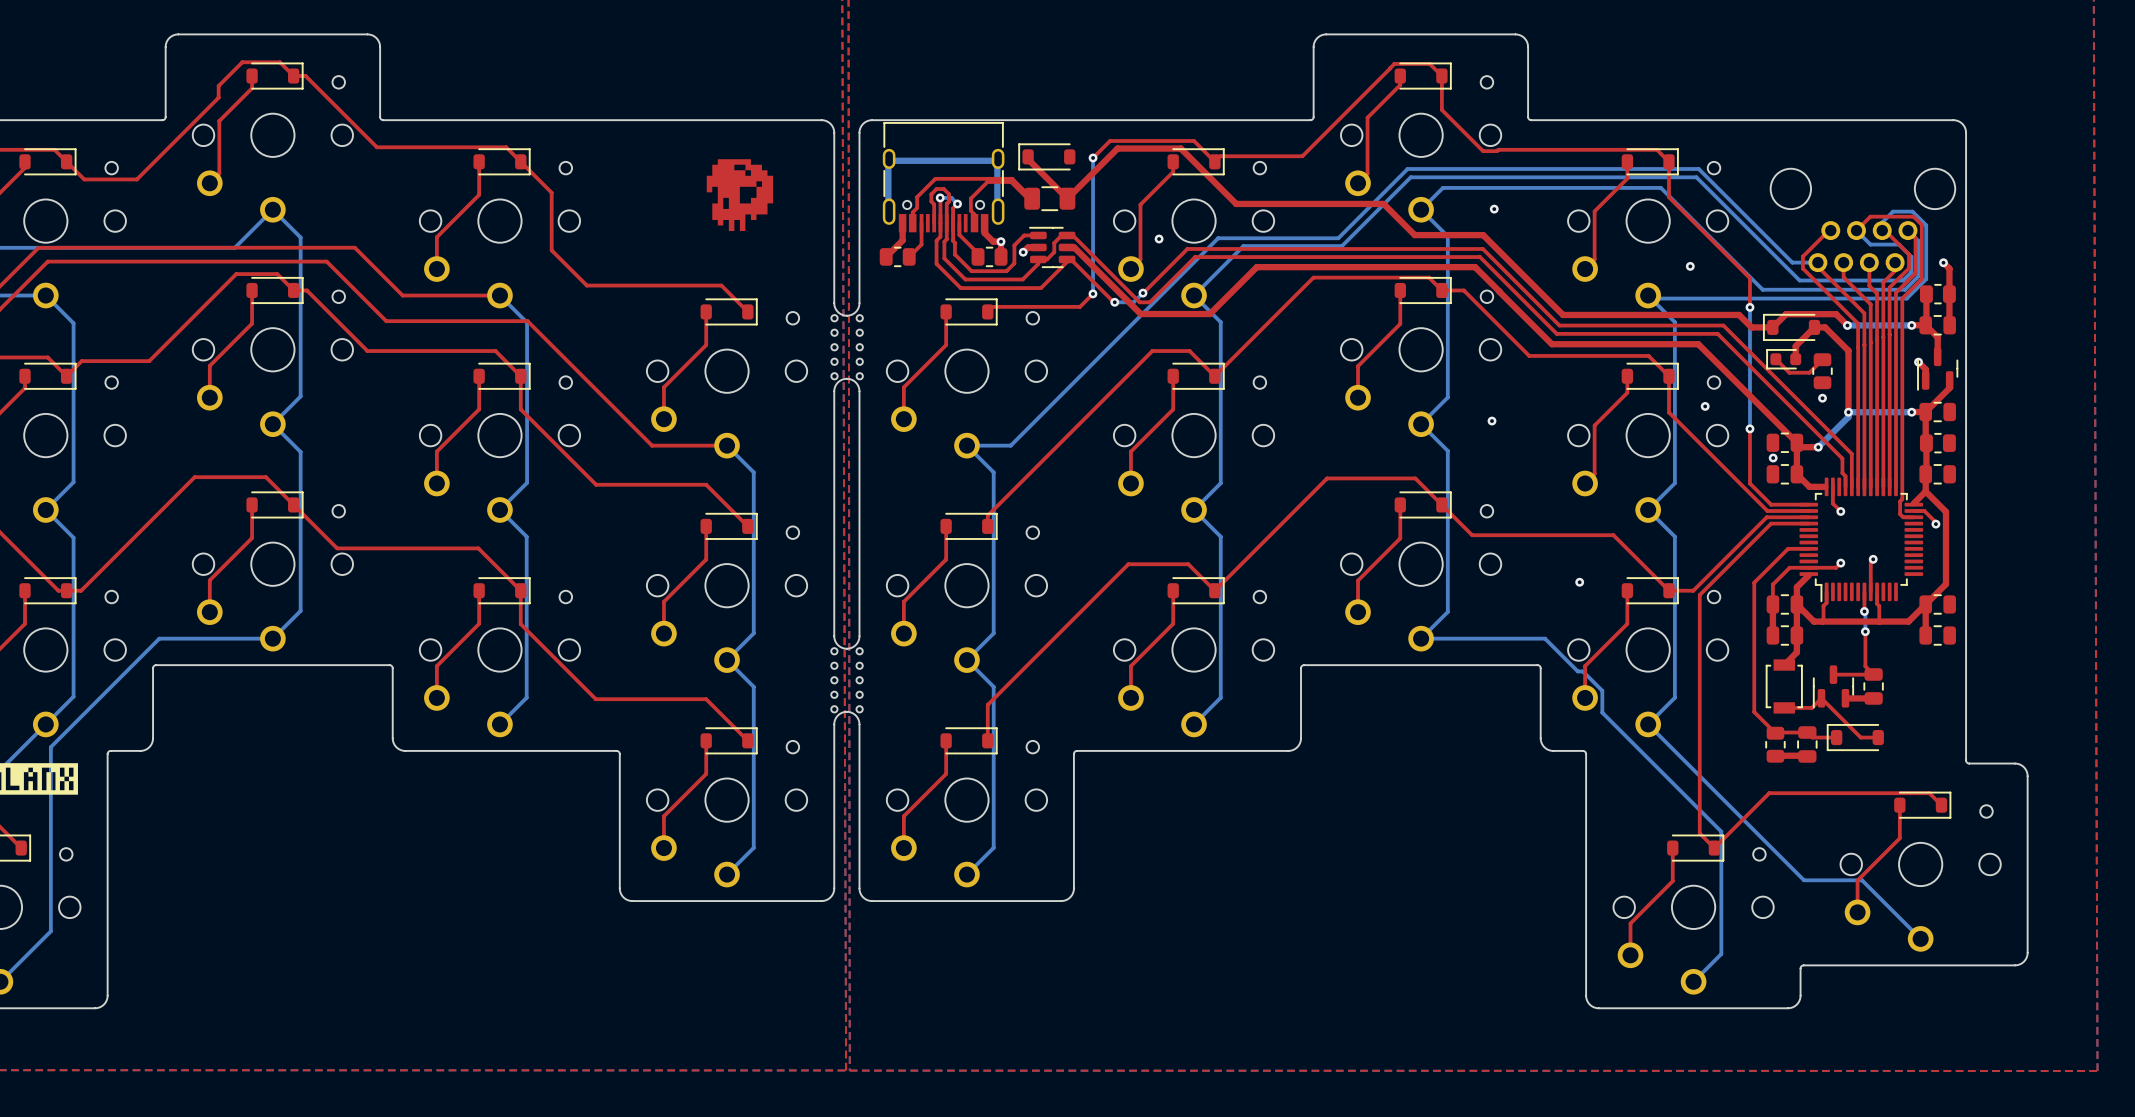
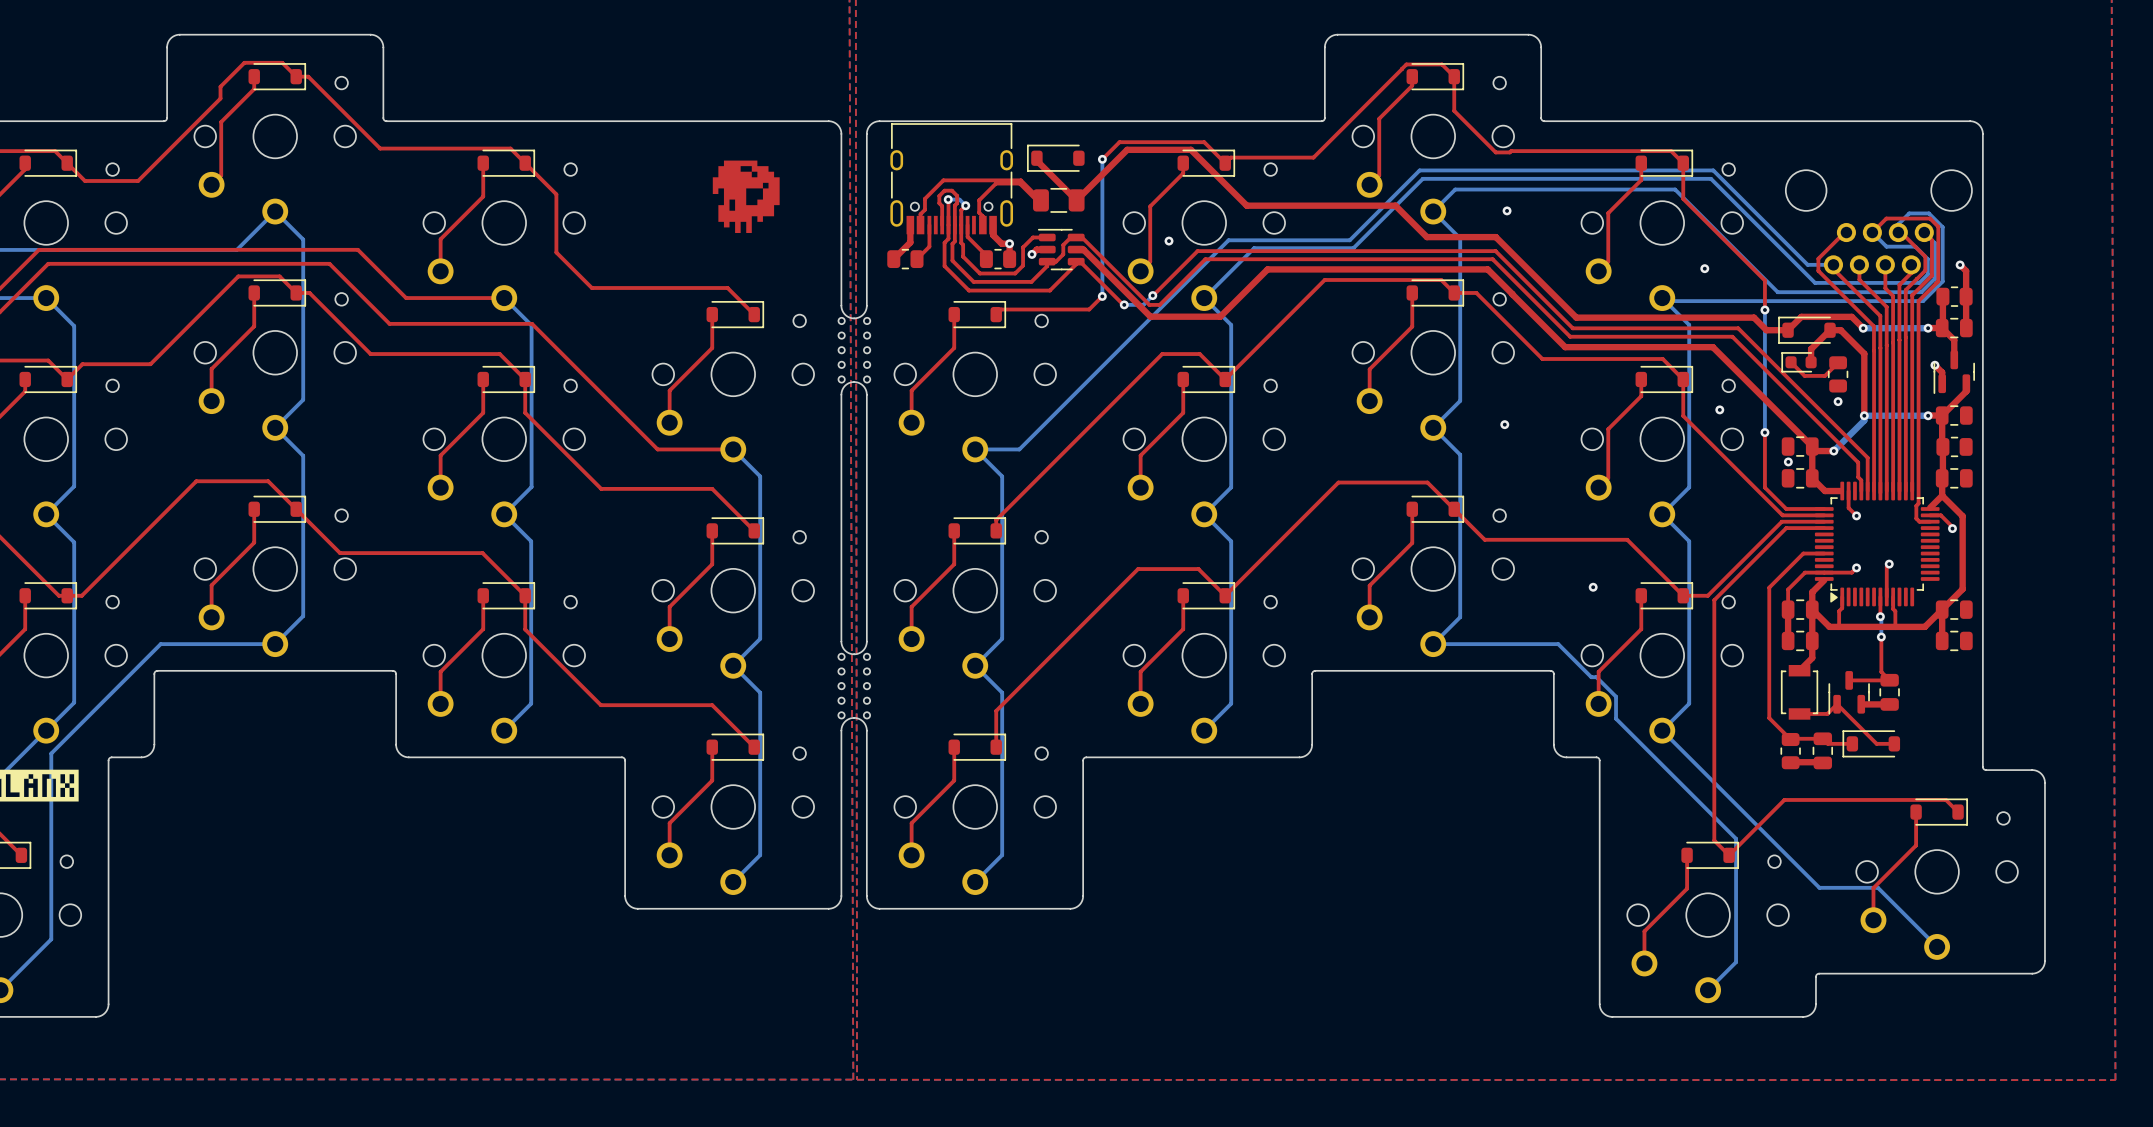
bottom track: (888, 213) (888, 160) (997, 160) (997, 213) -> none
part footprint: [1799, 477, 1924, 602] -> [1814, 481, 1940, 607]

